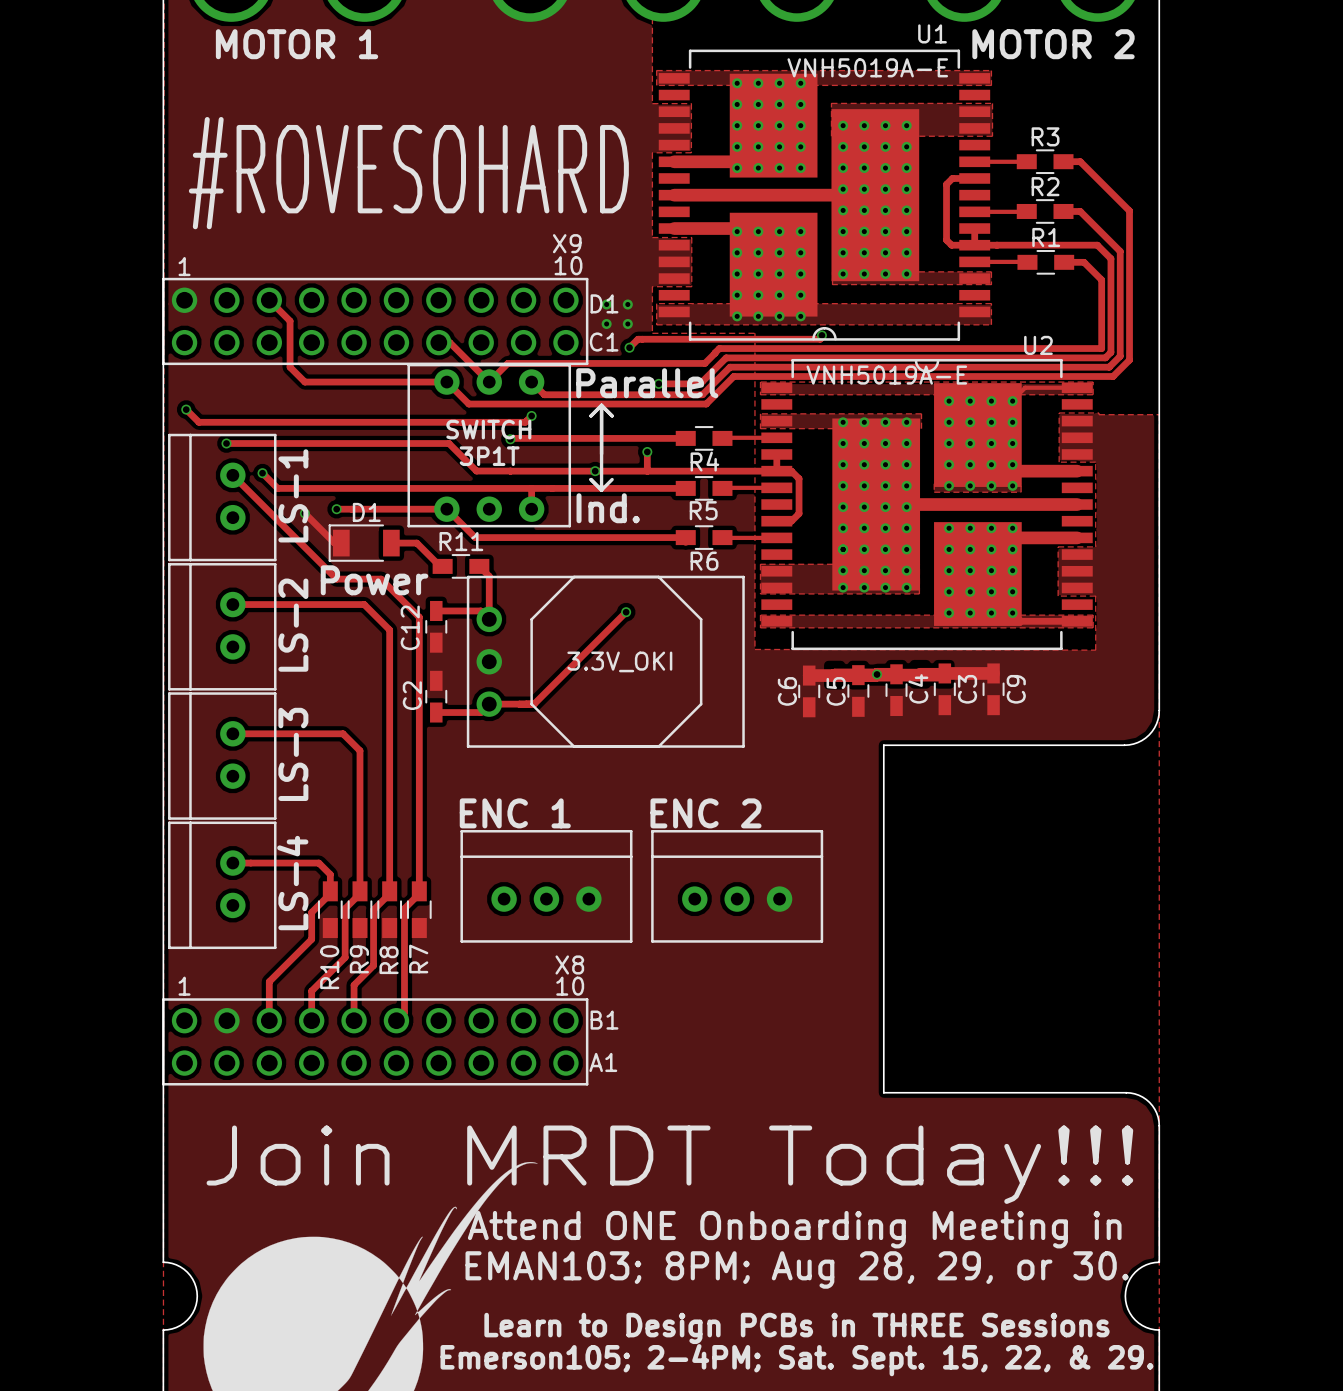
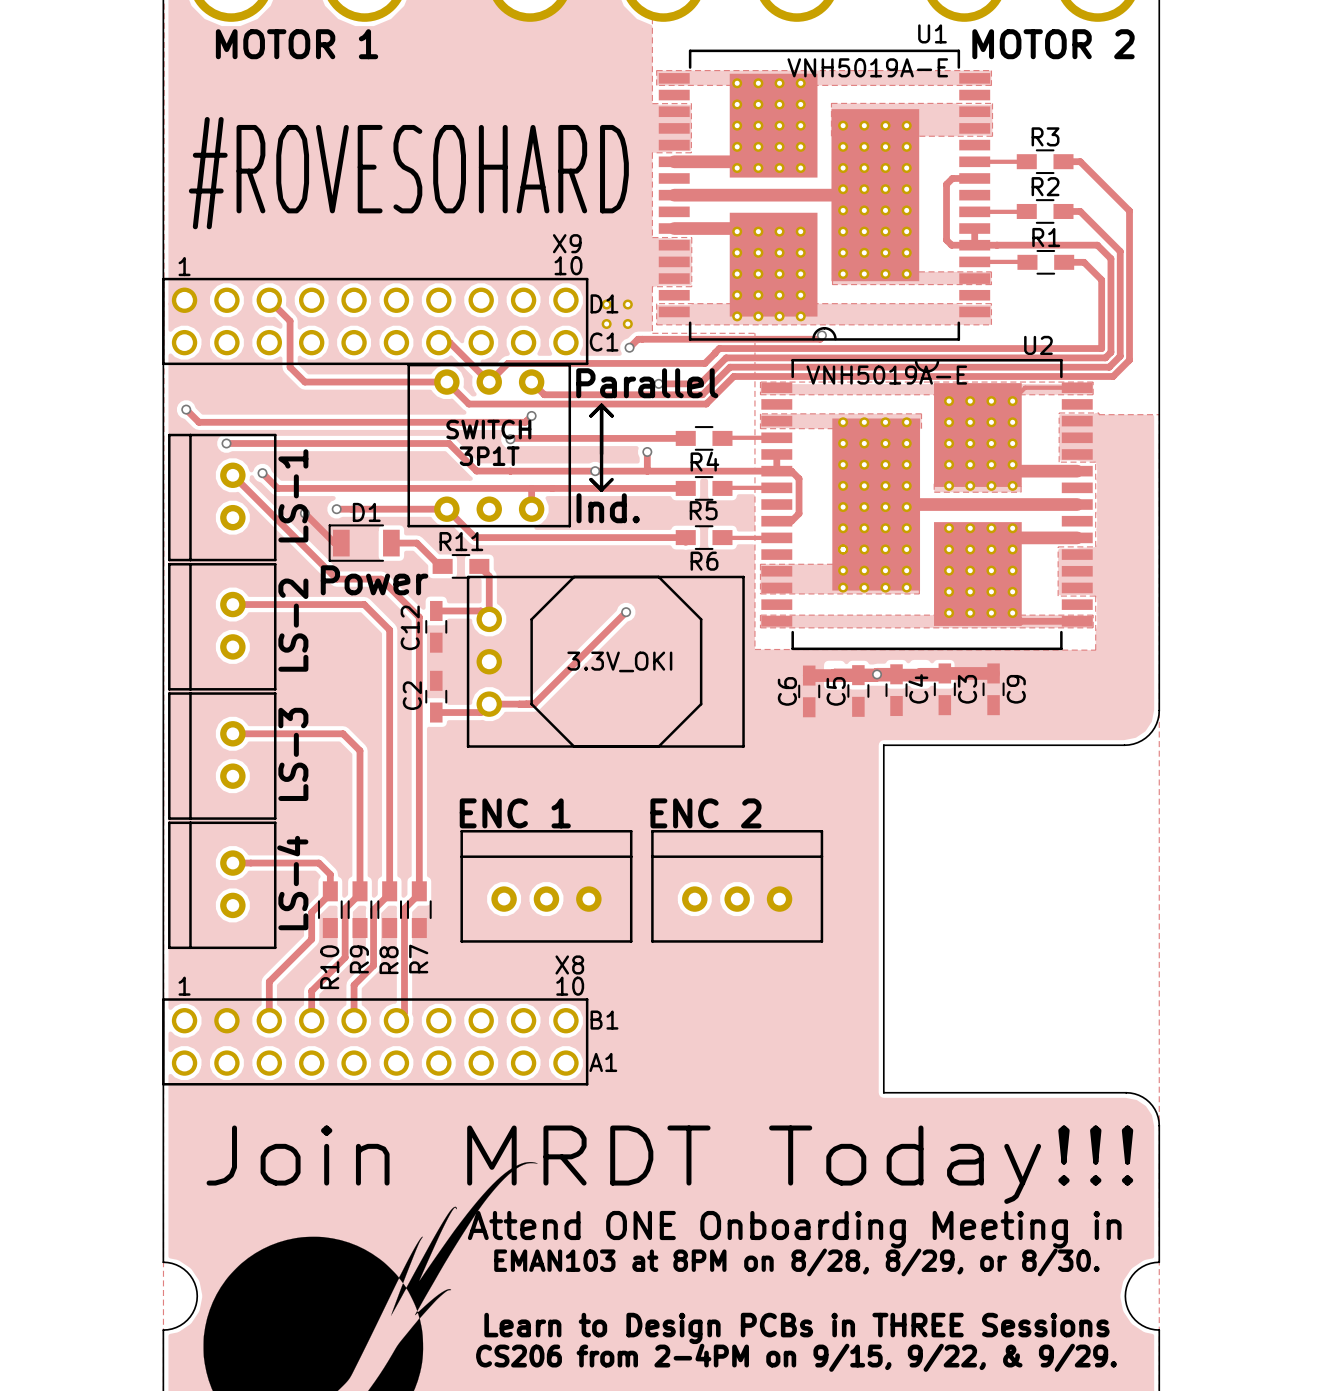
text: EMAN103; 8PM; Aug 28, 29, or 30. (797, 1269) -> EMAN103 at 8PM on 8/28, 8/29, or 8/30. (796, 1262)
text: Emerson105; 2-4PM; Sat. Sept. 15, 22, & 29. (796, 1360) -> CS206 from 2-4PM on 9/15, 9/22, & 9/29. (796, 1357)

